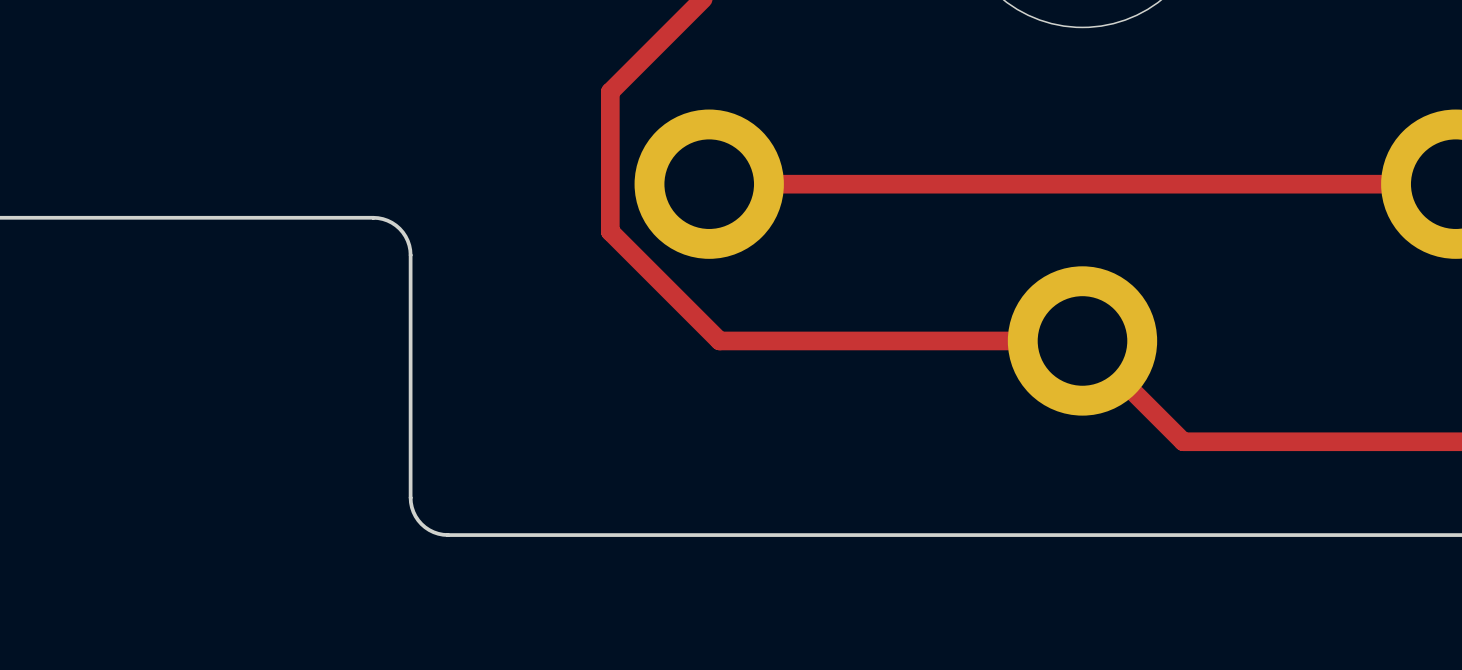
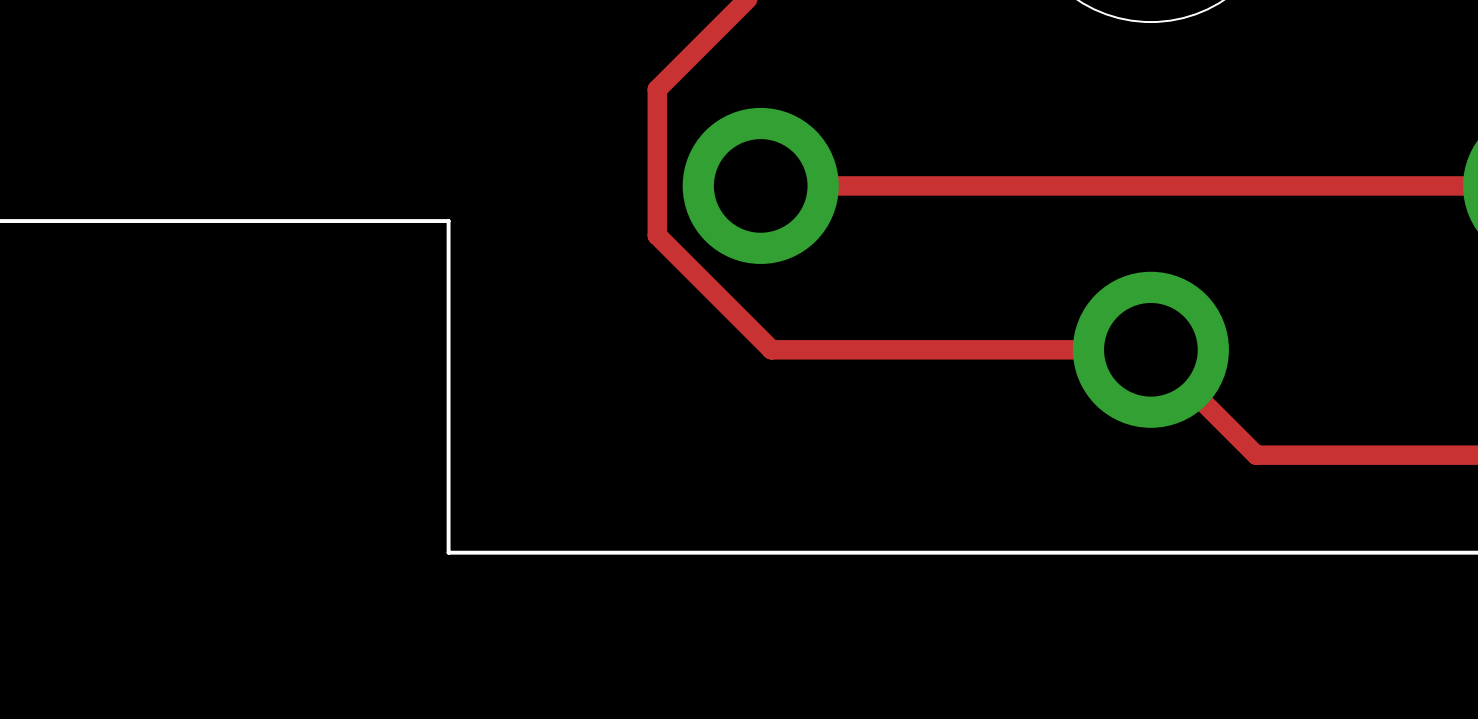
board edge: (373, 217) (387, 220) (399, 228) (407, 240) (410, 255) -> (409, 221) (448, 221) (448, 260)
board edge: (410, 497) (413, 512) (421, 524) (433, 532) (447, 535) -> (448, 513) (448, 552) (487, 552)

